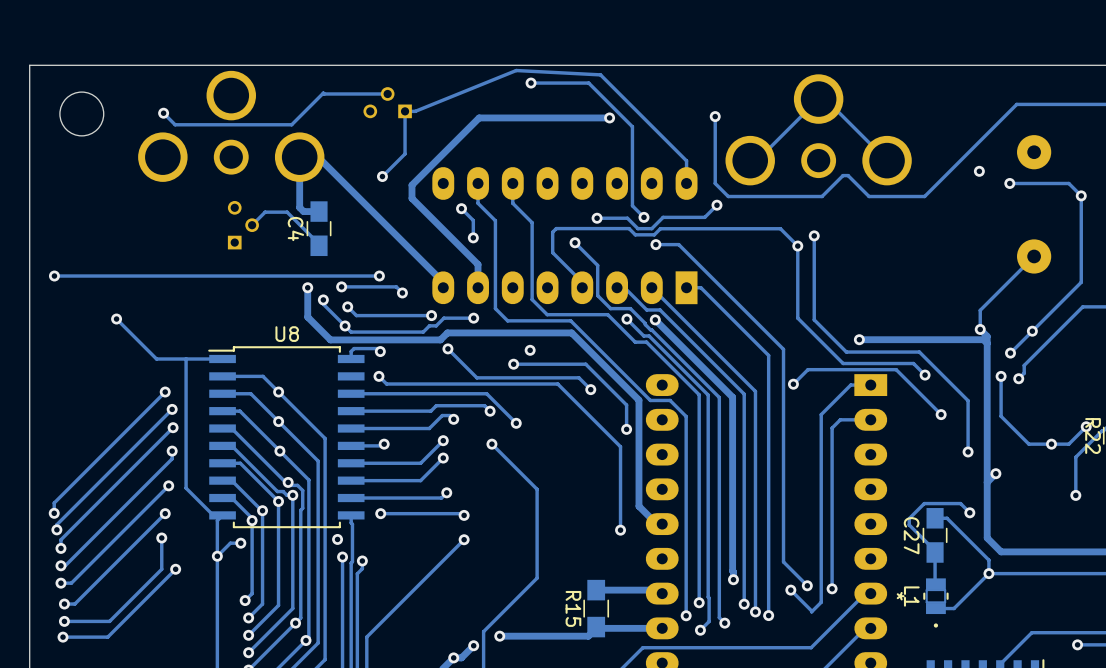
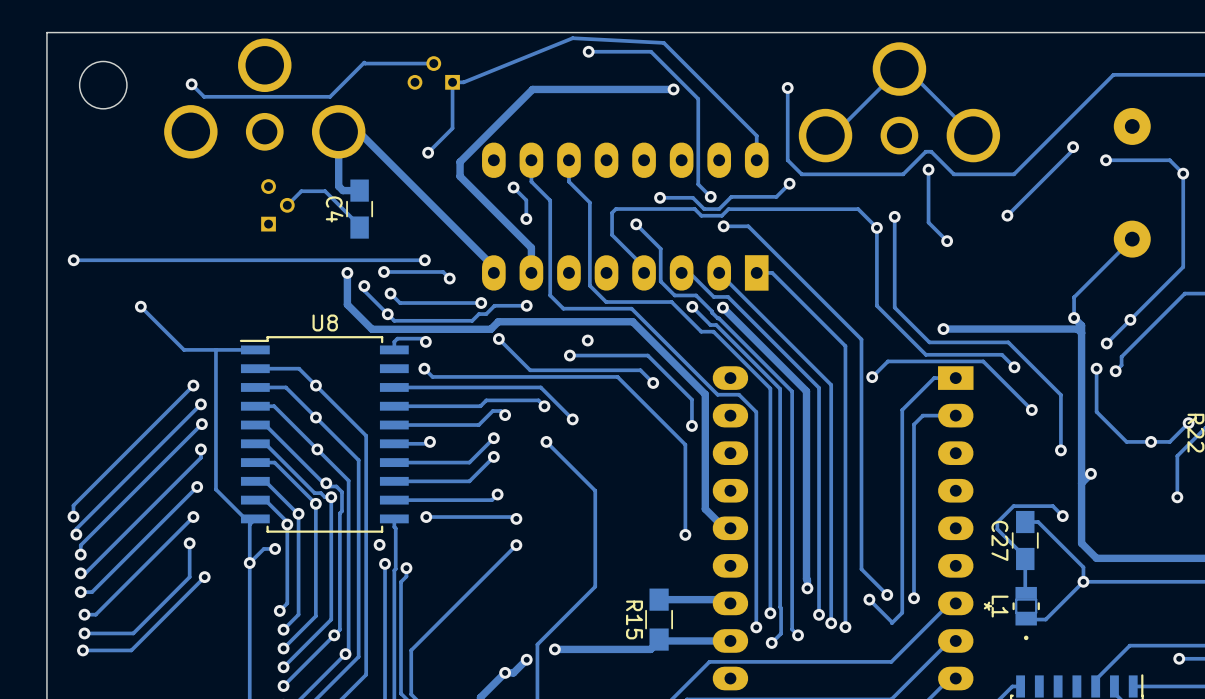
track: none -> (1073, 149) (1007, 215)
track: none -> (928, 169) (928, 222) (947, 241)
via: none -> (928, 169)
via: none -> (1007, 215)
via: none -> (947, 241)

